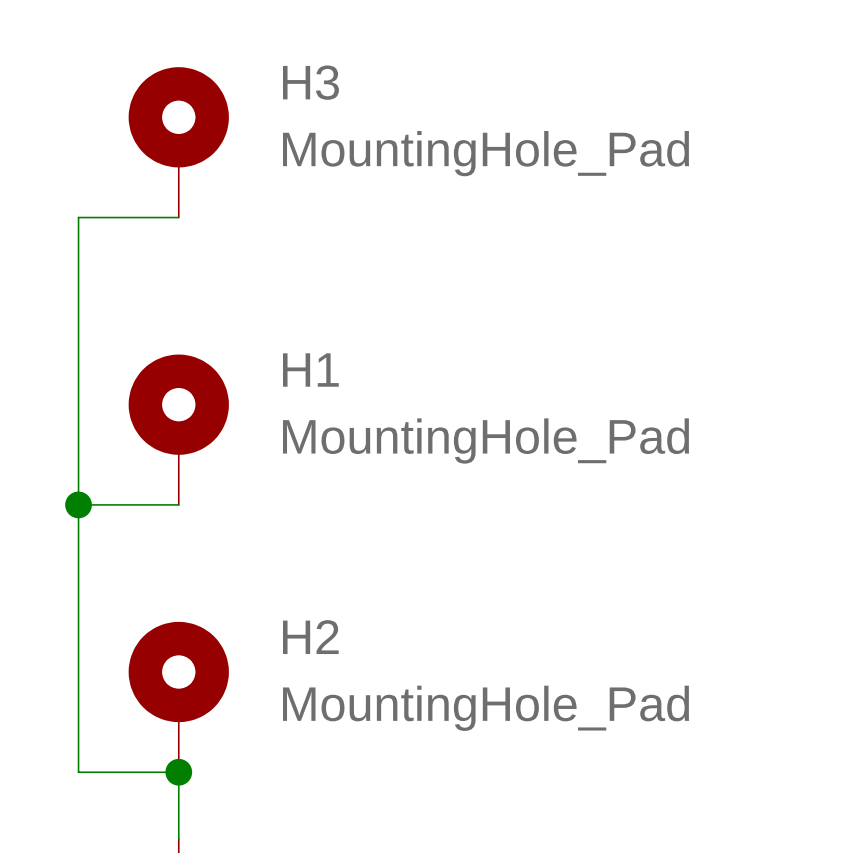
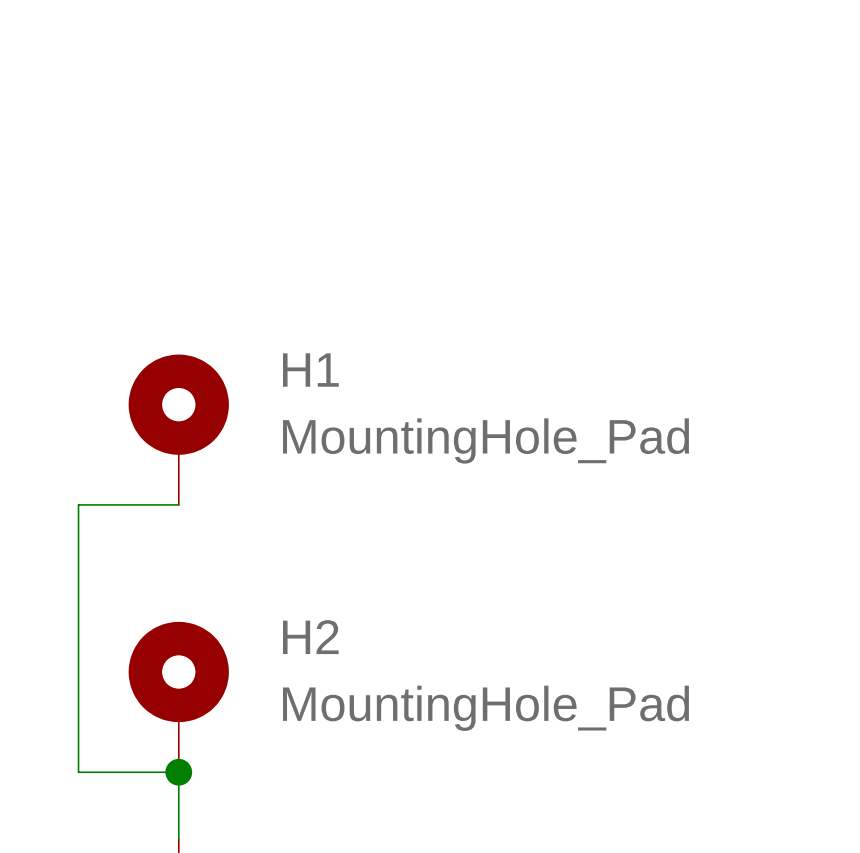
H3: MountingHole_Pad (178, 142) -> none
wire: (178, 217) (78, 217) (78, 504) -> none
junction: (78, 504) -> none

